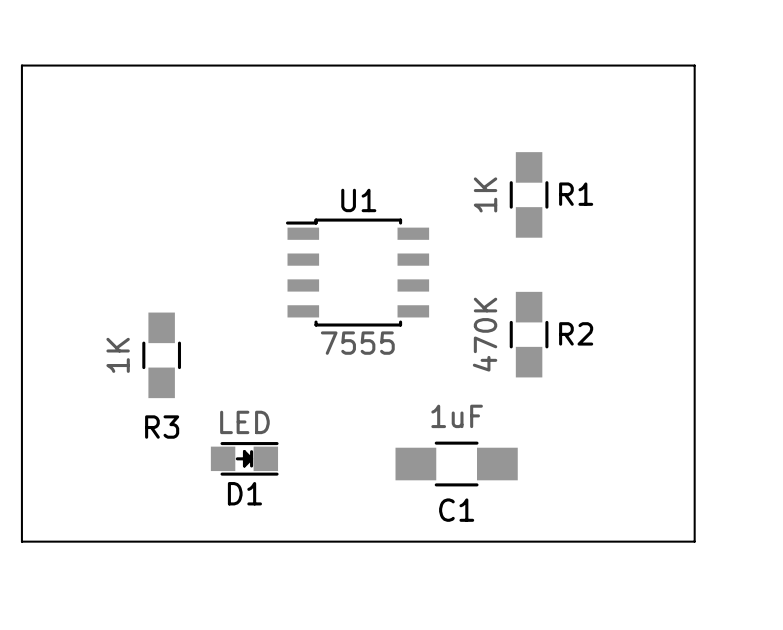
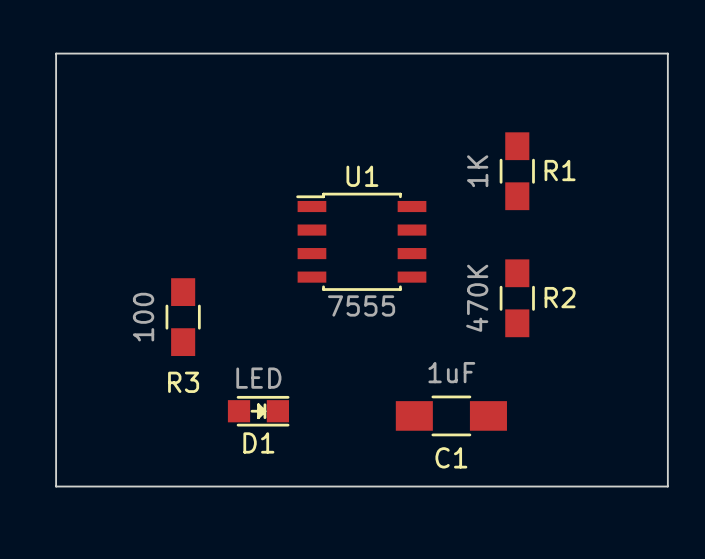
R3 value: 1K (118, 355) -> 100 (143, 317)

